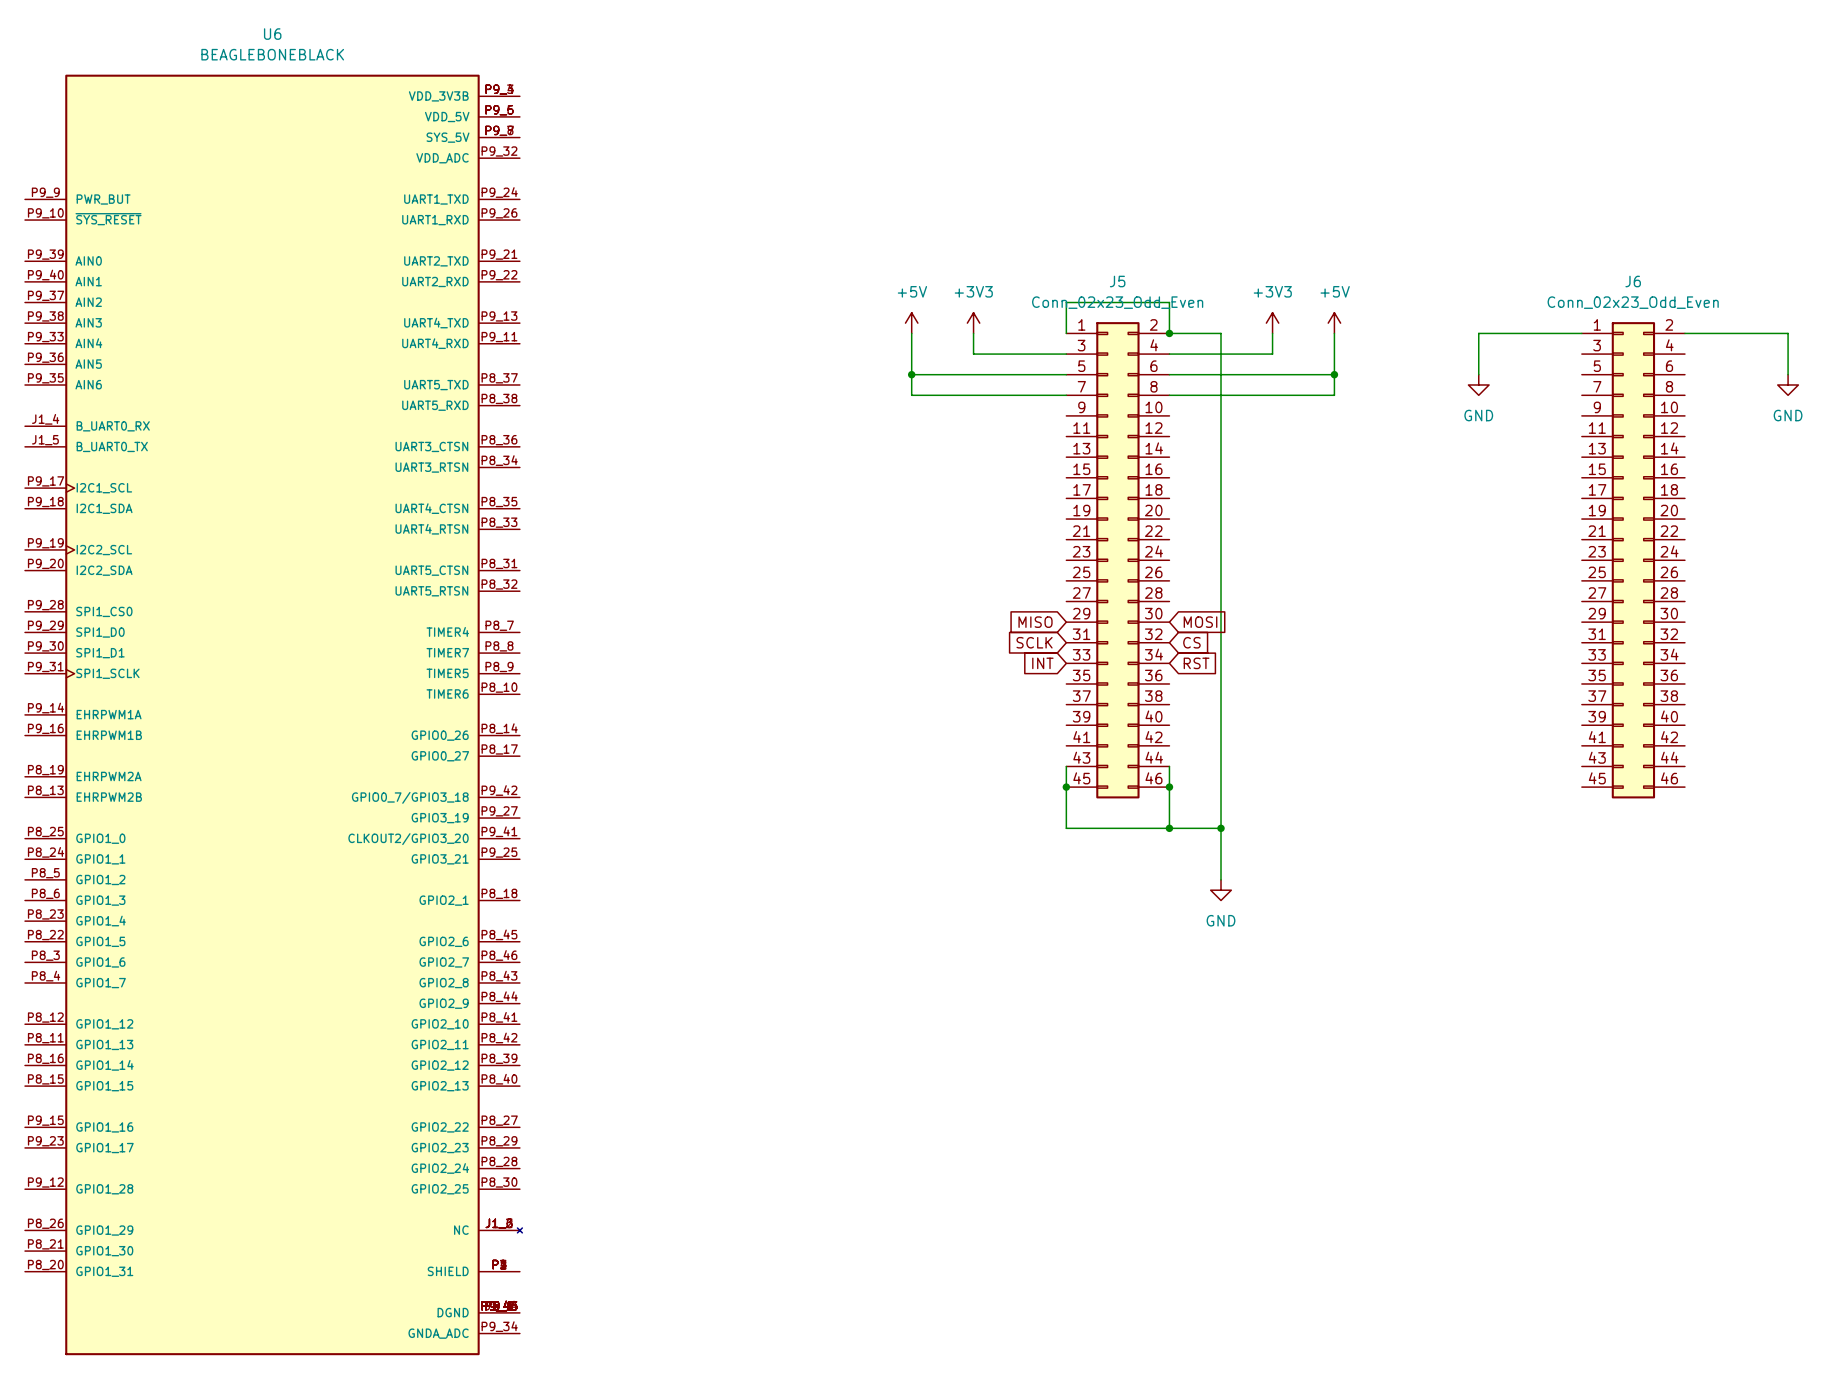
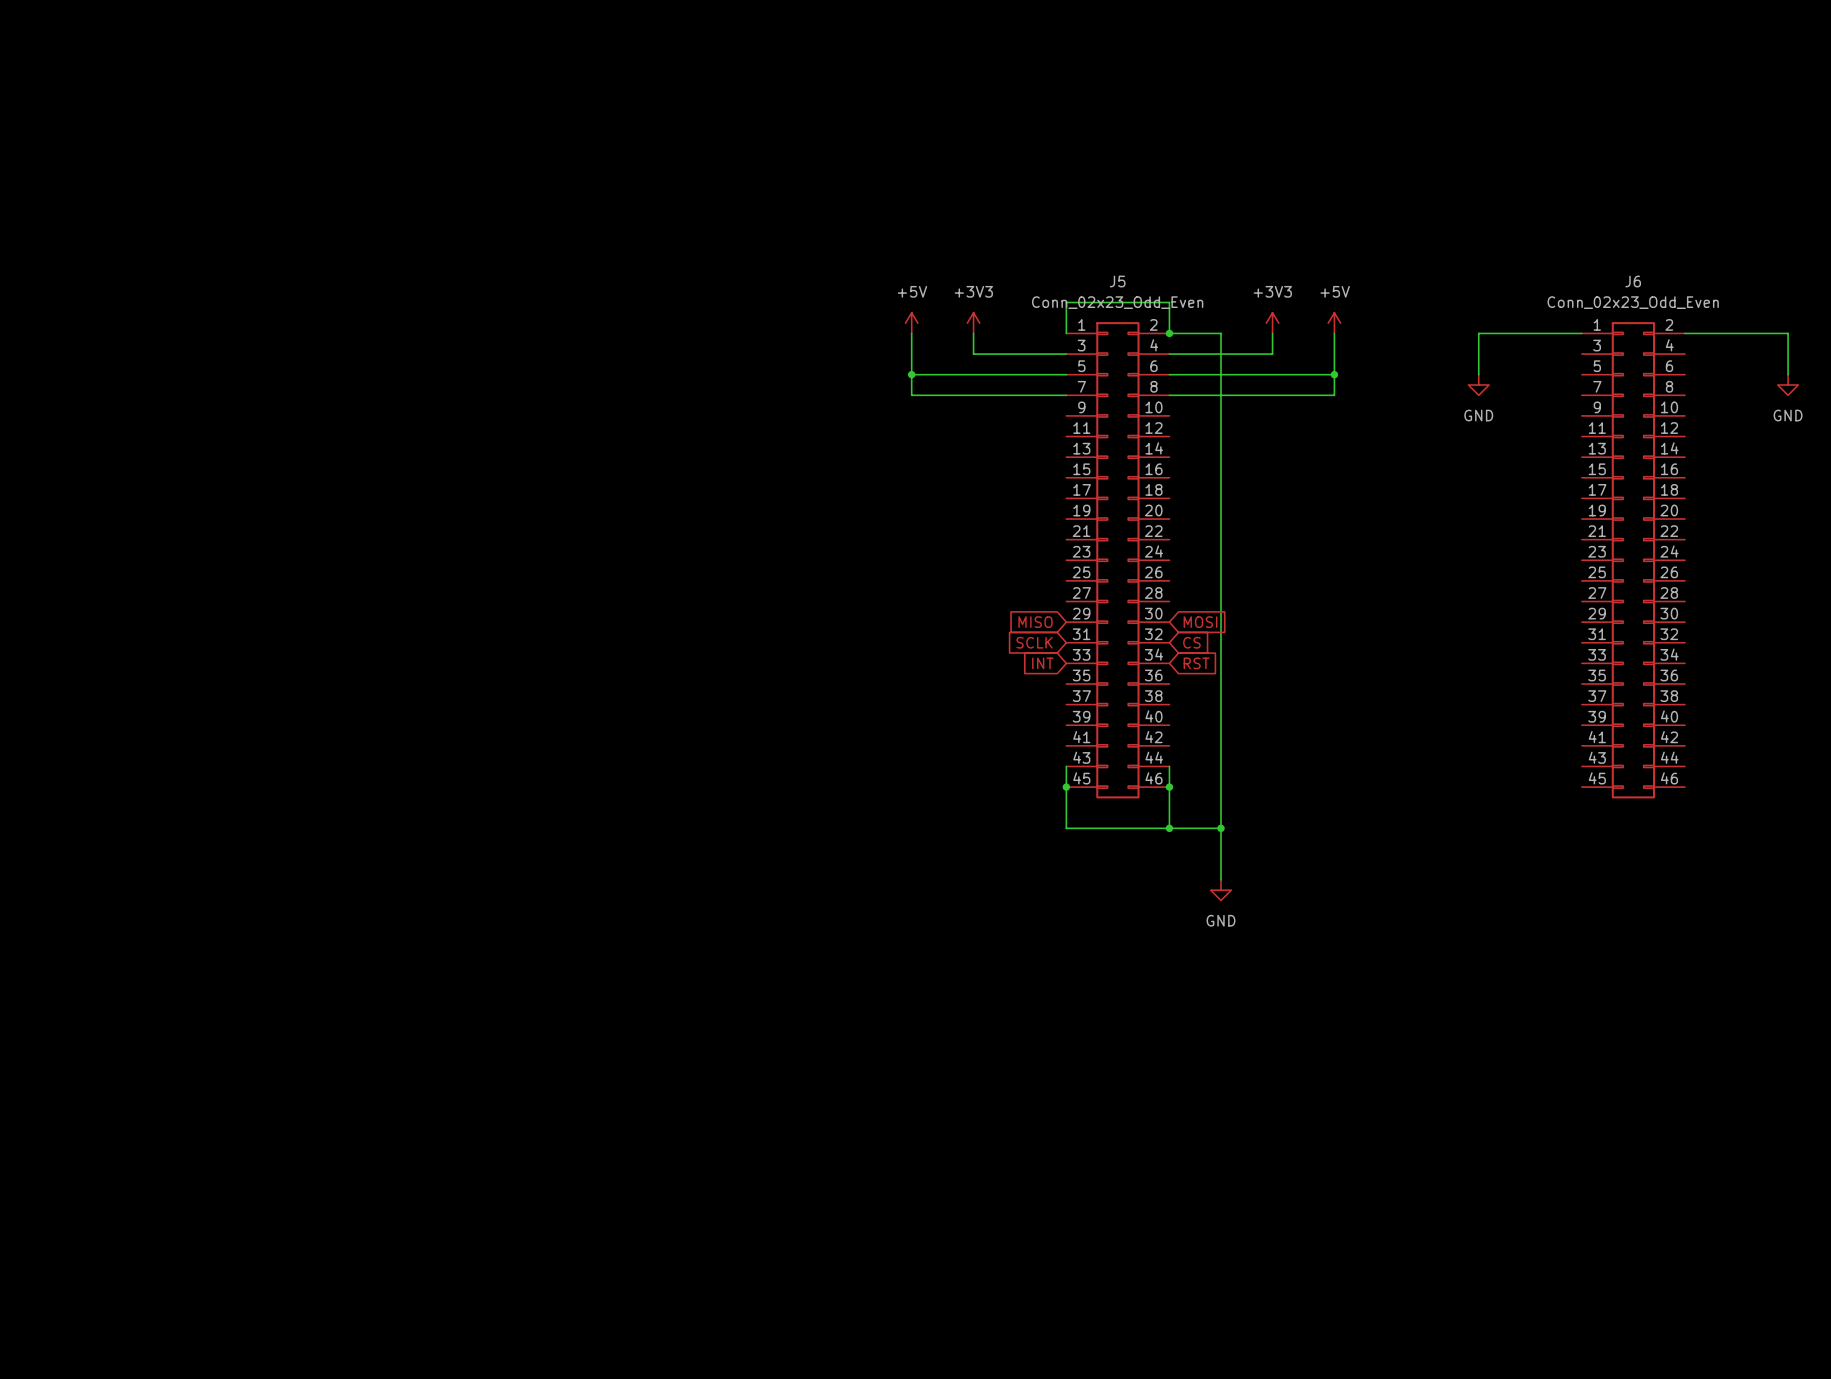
U6: BEAGLEBONEBLACK (273, 714) -> none

